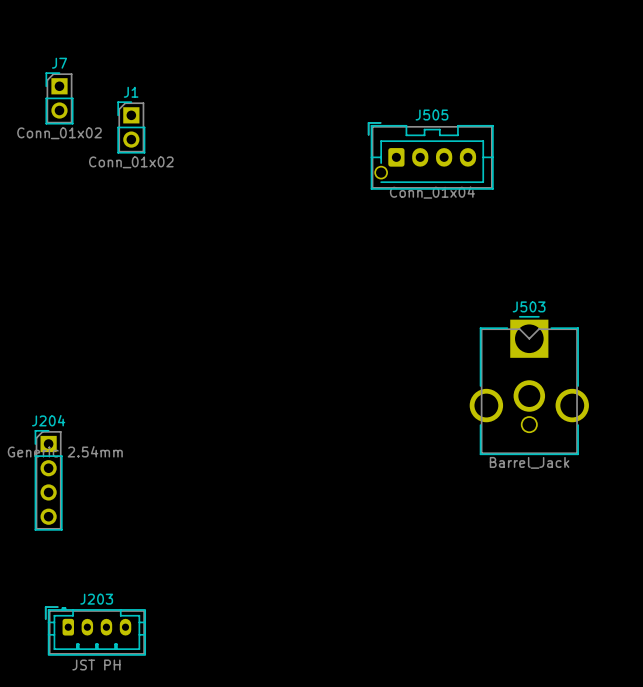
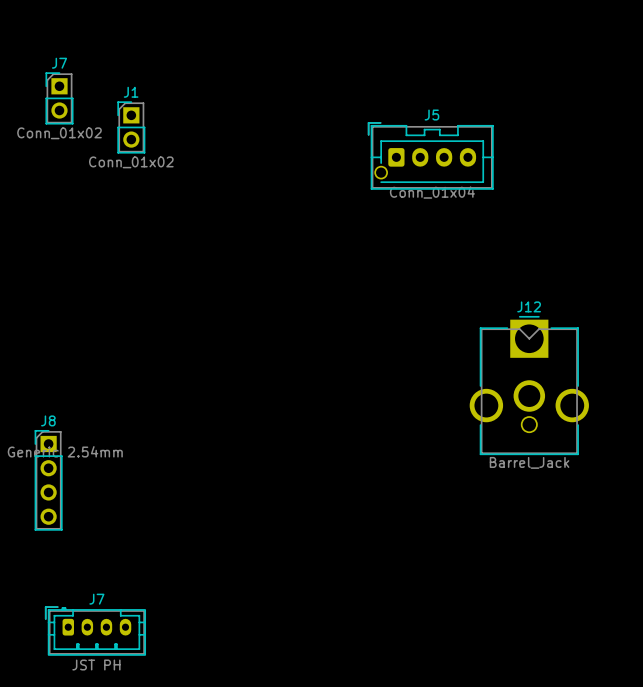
J505 name: J505 (431, 115) -> J5 (431, 115)
J503 name: J503 (529, 306) -> J12 (529, 306)
J204 name: J204 (48, 420) -> J8 (48, 420)
J203 name: J203 (96, 599) -> J7 (96, 599)

